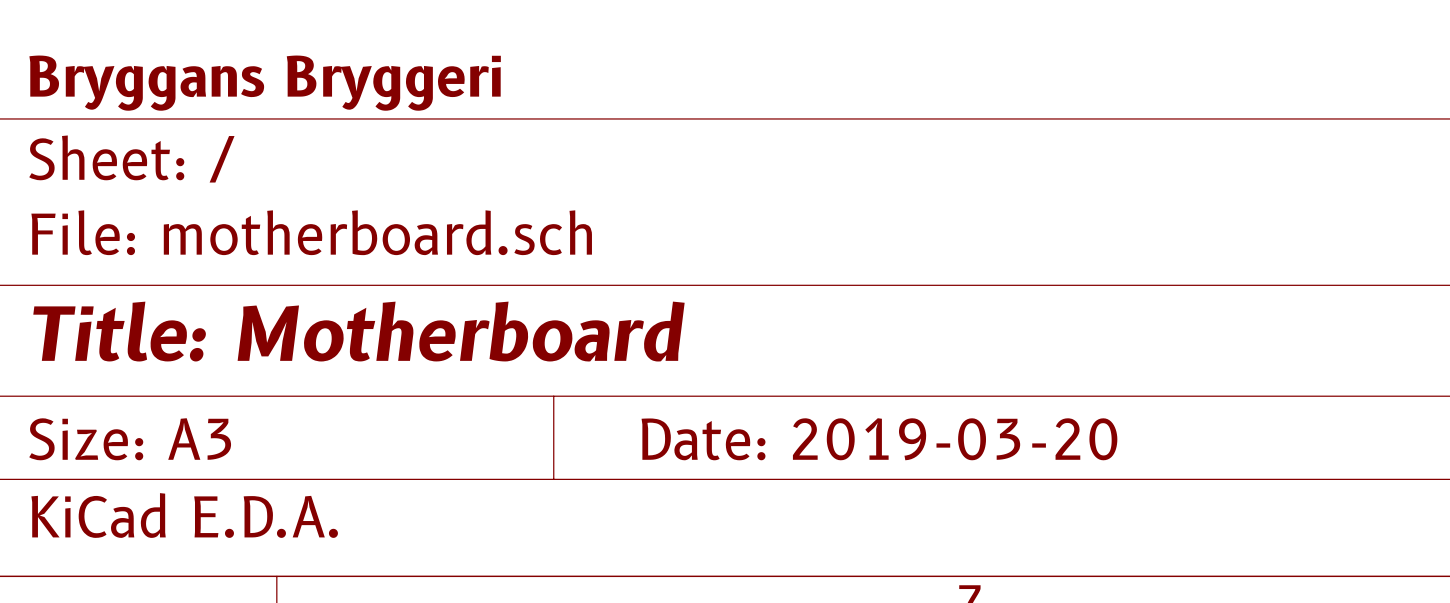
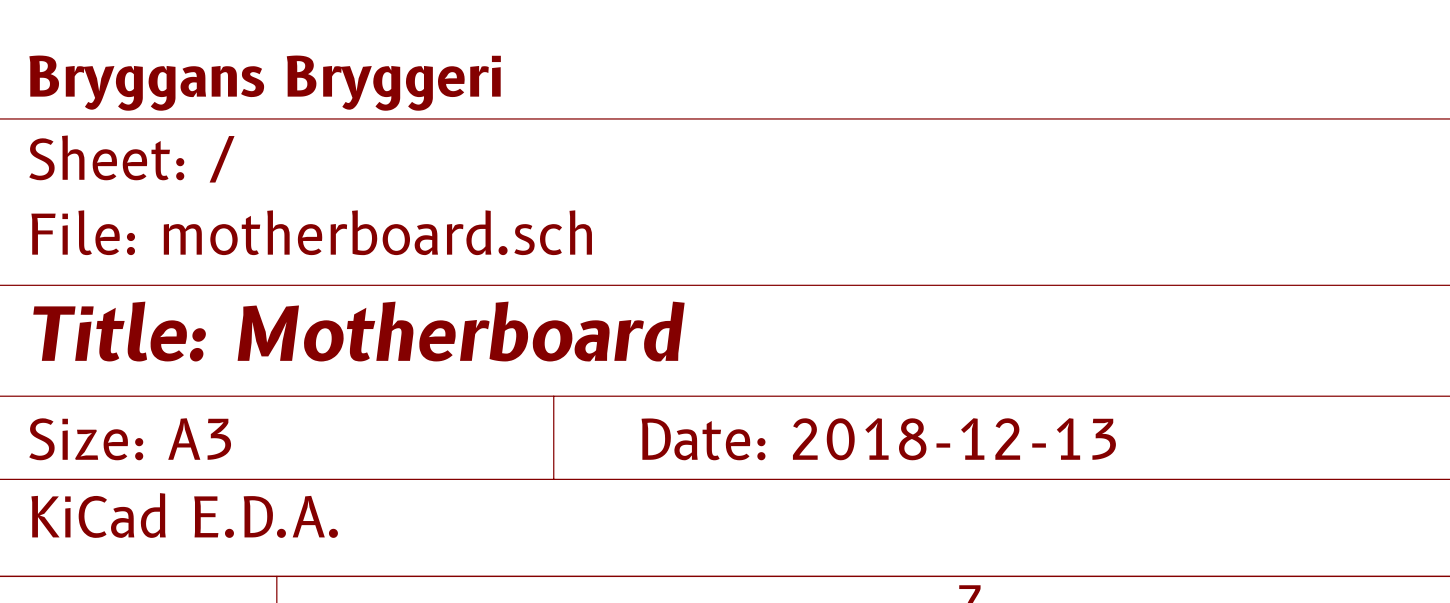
title block: Date: 2019-03-20 (879, 439) -> Date: 2018-12-13 (878, 439)

